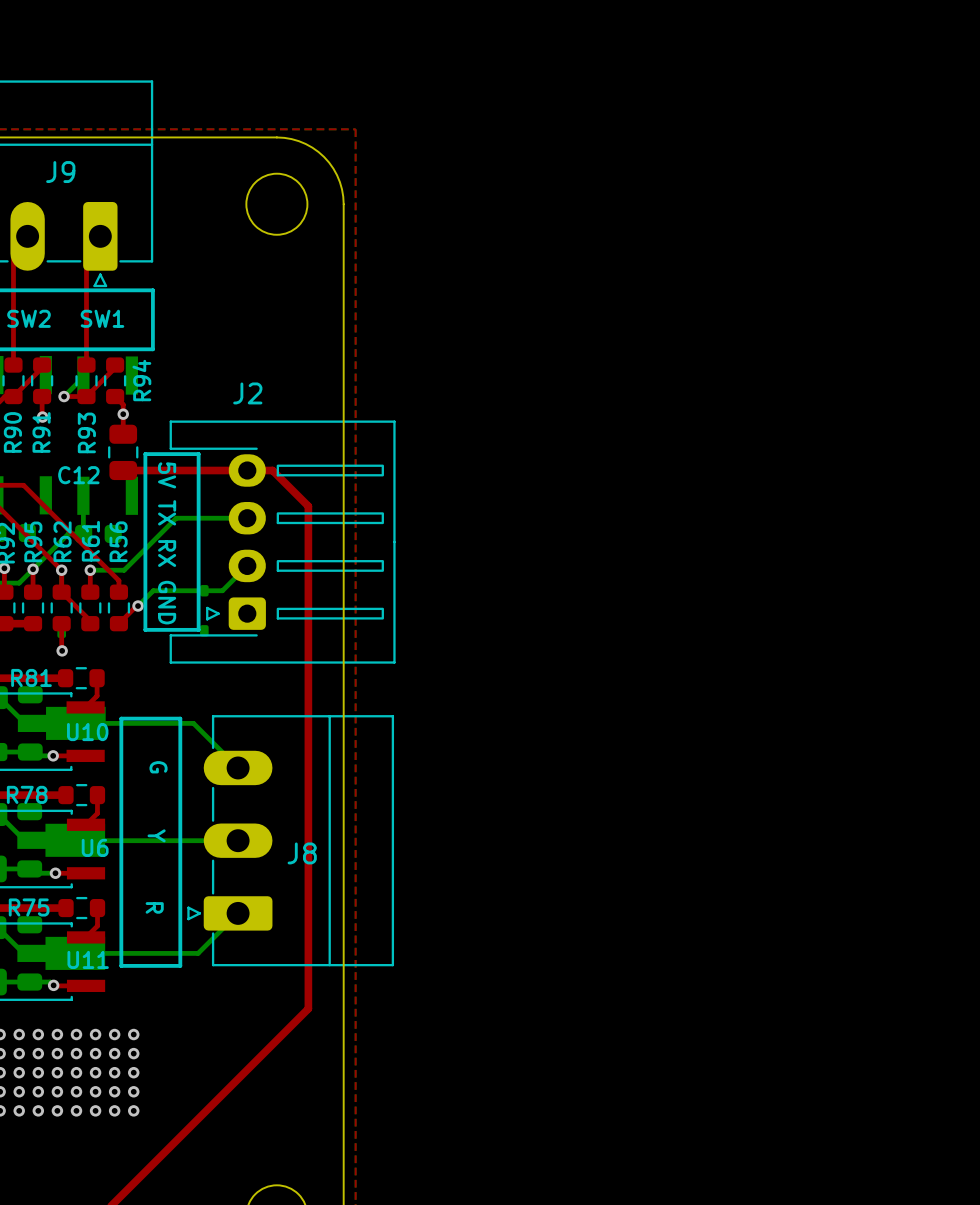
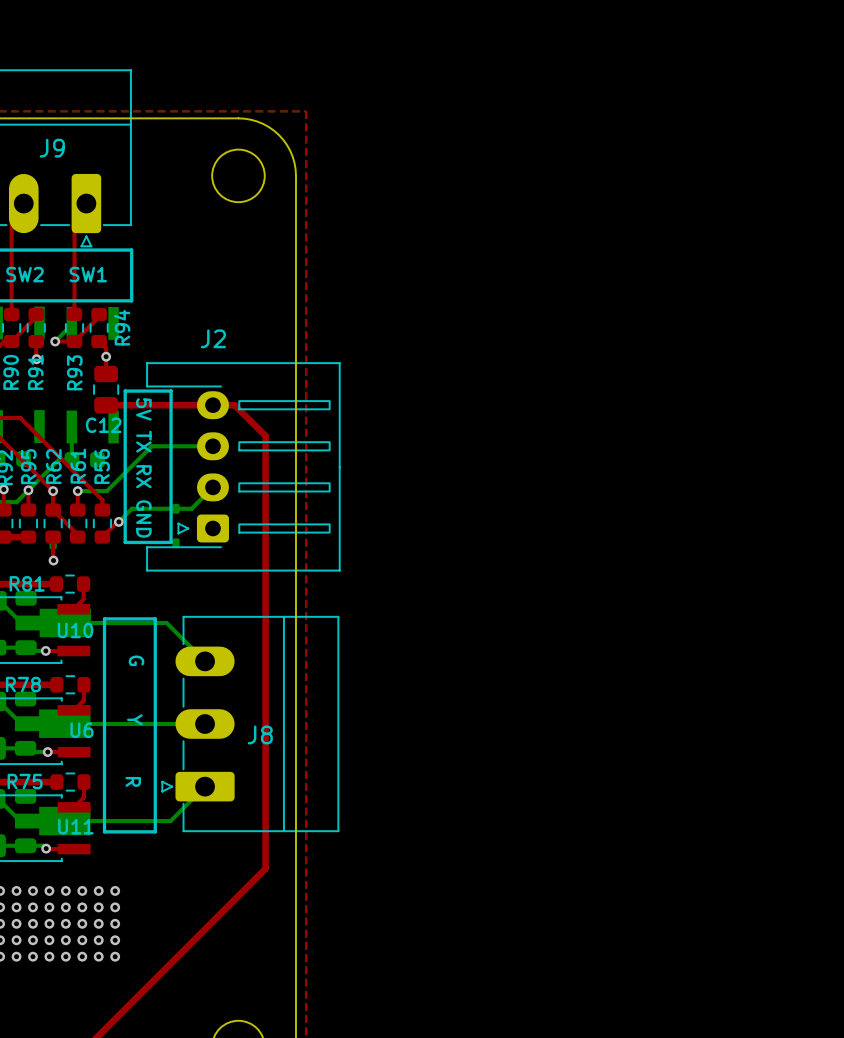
C12 name position: C12 (78, 475) -> C12 (103, 425)

